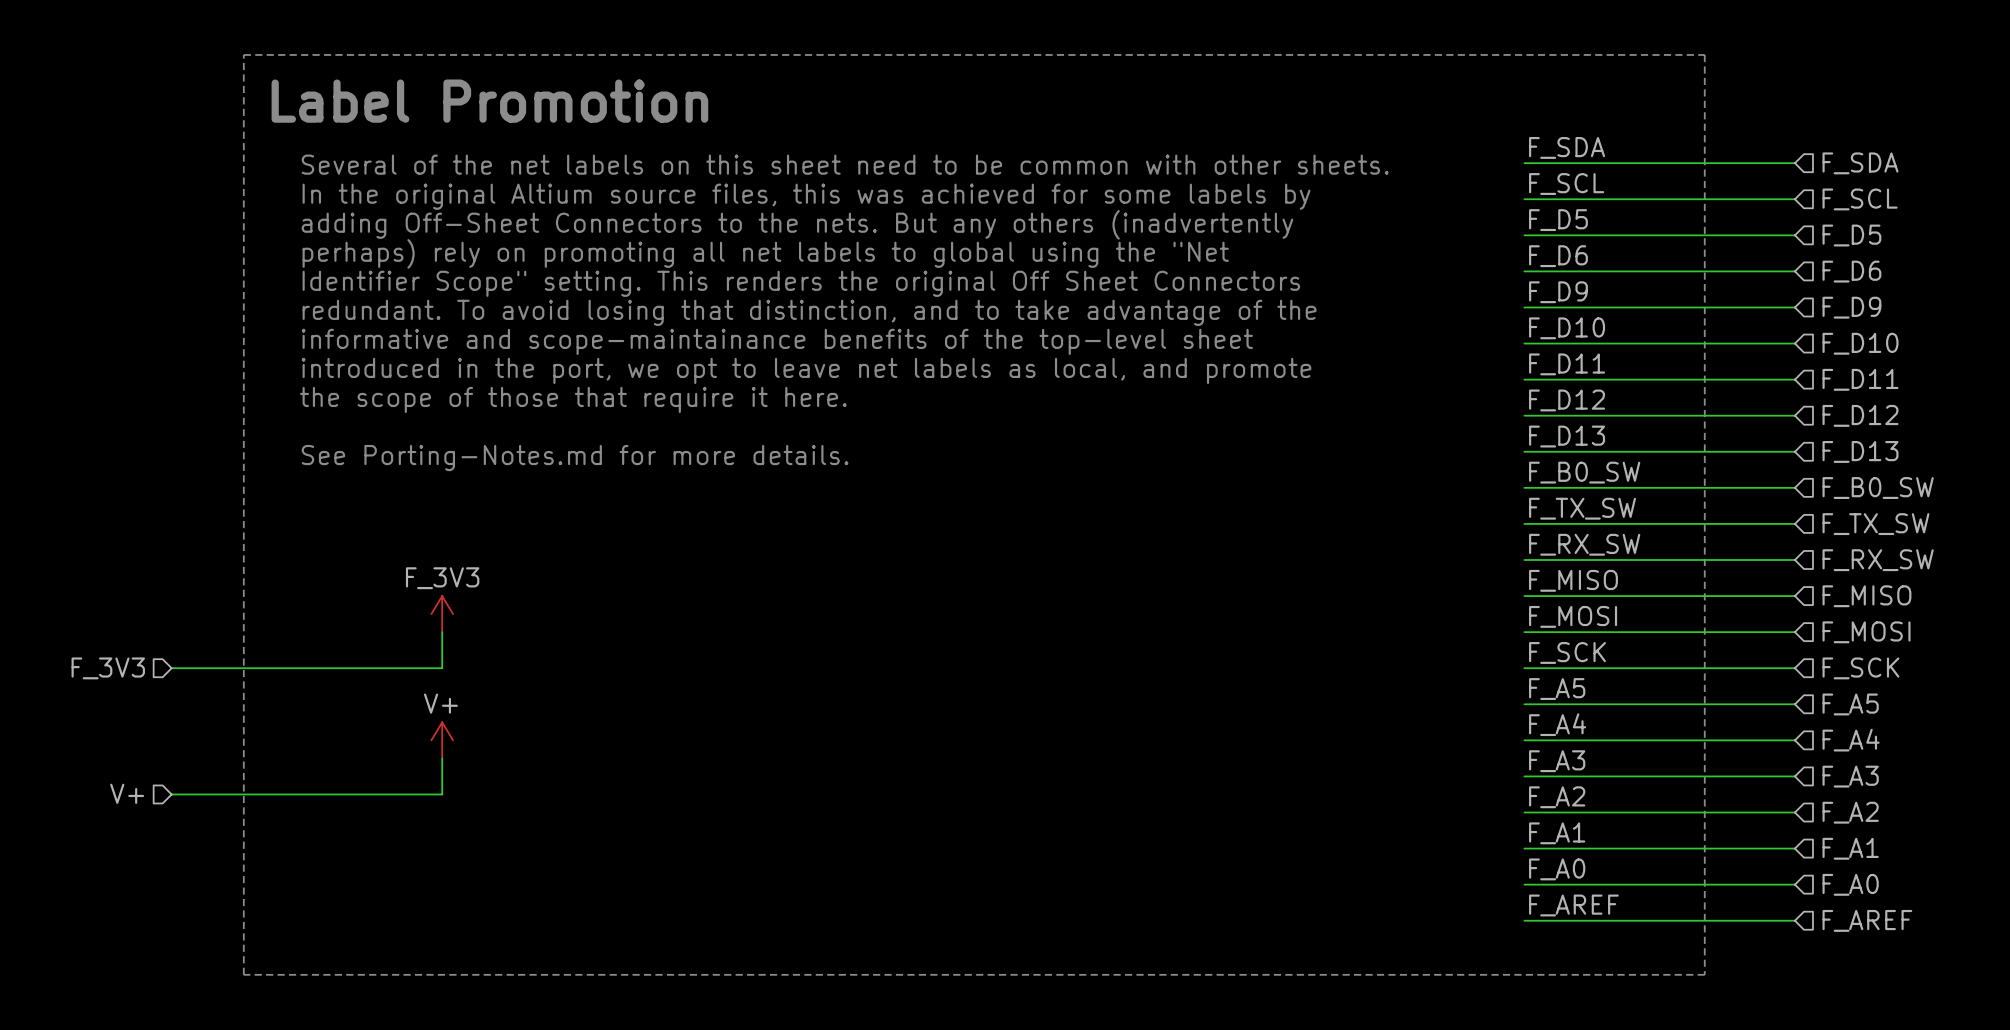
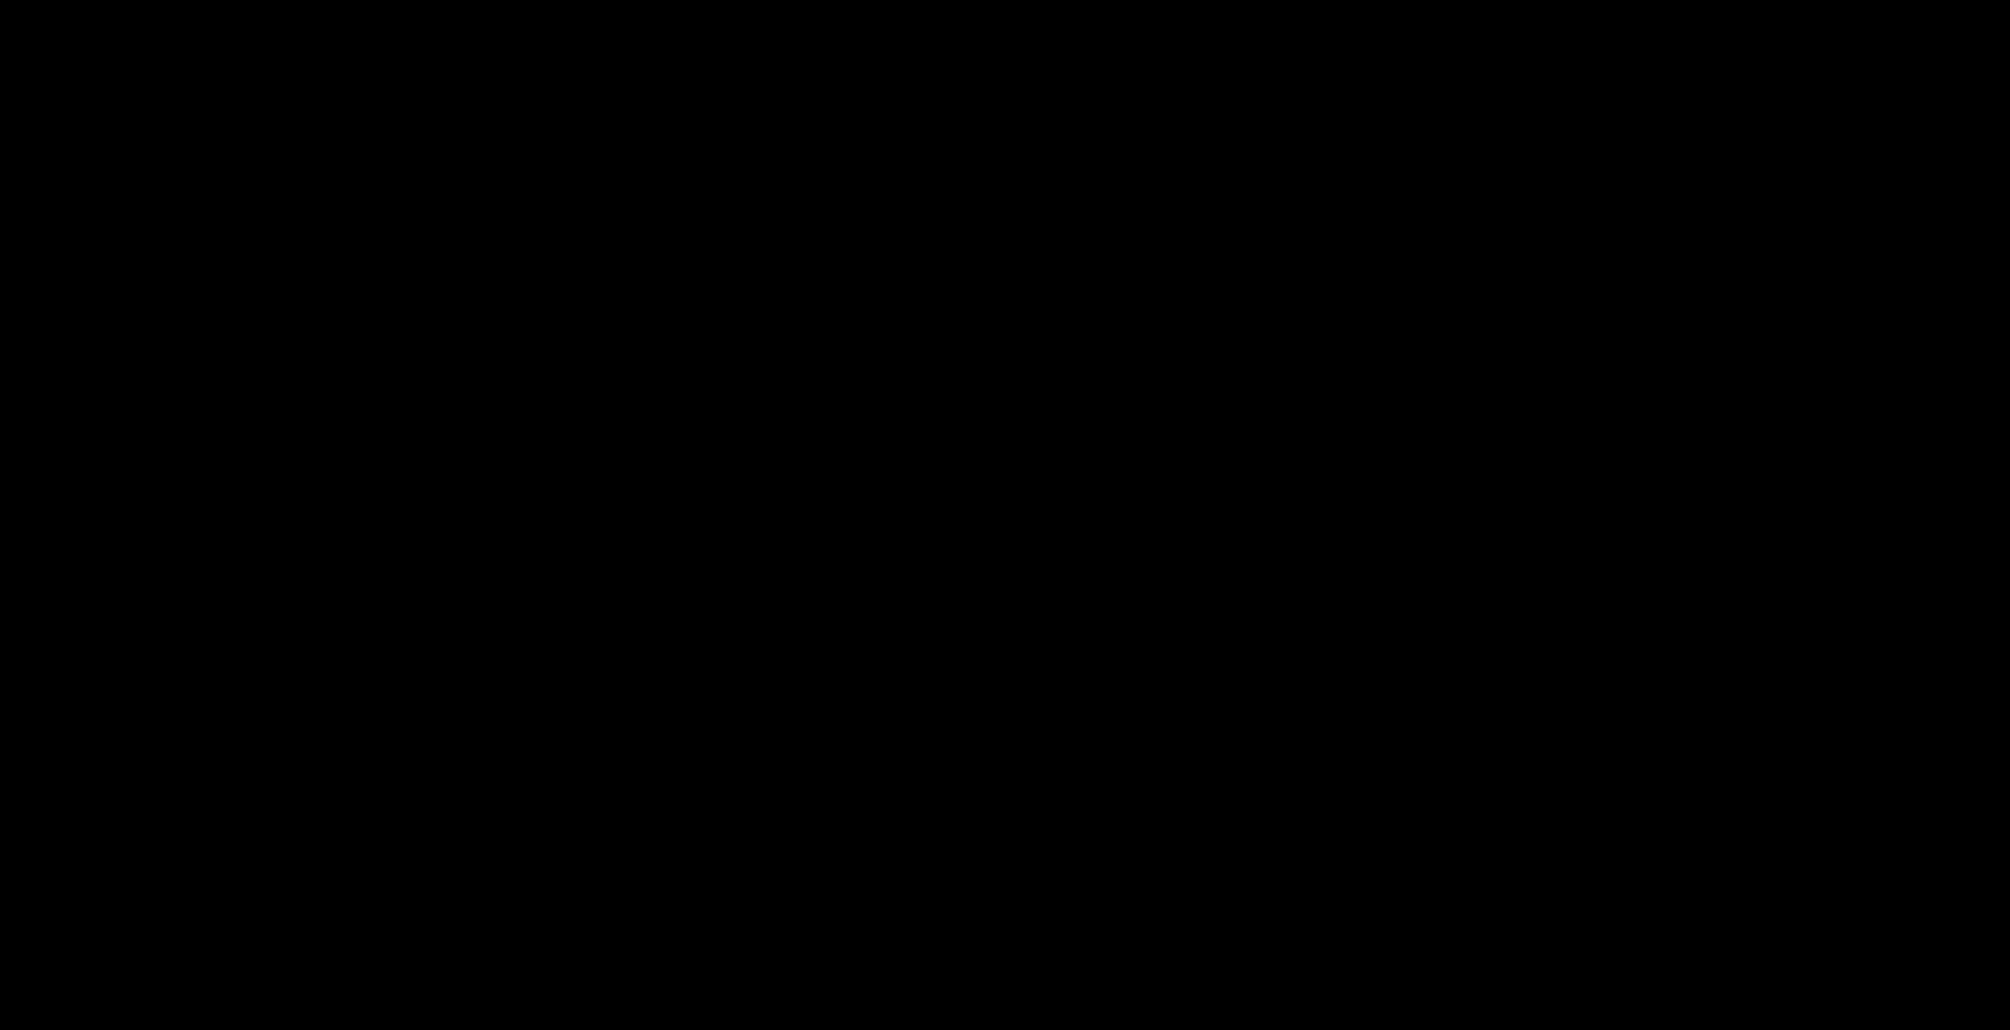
line: (243, 54) (1704, 54) (1704, 974) (243, 974) (243, 54) -> none
text: Label Promotion (489, 101) -> none
label: F_SDA (1567, 147) -> none
wire: (1524, 163) (1794, 163) -> none
hierarchical label: F_SDA (1860, 163) -> none
text: Several of the net labels on this sheet need to be common with other sheets. (845, 164) -> none
label: F_SCL (1566, 184) -> none
text: In the original Altium source files, this was achieved for some labels by (806, 196) -> none
wire: (1524, 199) (1794, 199) -> none
hierarchical label: F_SCL (1860, 199) -> none
label: F_D5 (1558, 220) -> none
text: adding Off-Sheet Connectors to the nets. But any others (inadvertently (797, 224) -> none
wire: (1524, 235) (1794, 235) -> none
hierarchical label: F_D5 (1851, 235) -> none
text: perhaps) rely on promoting all net labels to global using the "Net (765, 253) -> none
label: F_D6 (1558, 256) -> none
wire: (1524, 271) (1794, 271) -> none
hierarchical label: F_D6 (1851, 271) -> none
text: Identifier Scope" setting. This renders the original Off Sheet Connectors (801, 283) -> none
label: F_D9 (1558, 292) -> none
wire: (1524, 307) (1794, 307) -> none
hierarchical label: F_D9 (1851, 307) -> none
text: redundant. To avoid losing that distinction, and to take advantage of the (809, 312) -> none
label: F_D10 (1567, 328) -> none
text: informative and scope-maintainance benefits of the top-level sheet (777, 341) -> none
wire: (1524, 343) (1794, 343) -> none
hierarchical label: F_D10 (1860, 343) -> none
label: F_D11 (1567, 364) -> none
text: introduced in the port, we opt to leave net labels as local, and promote (806, 370) -> none
wire: (1524, 379) (1794, 379) -> none
hierarchical label: F_D11 (1860, 379) -> none
text: the scope of those that require it here. (573, 399) -> none
label: F_D12 (1567, 400) -> none
wire: (1524, 415) (1794, 415) -> none
hierarchical label: F_D12 (1860, 415) -> none
label: F_D13 (1567, 436) -> none
wire: (1524, 451) (1794, 451) -> none
hierarchical label: F_D13 (1860, 451) -> none
text: See Porting-Notes.md for more details. (575, 458) -> none
label: F_B0_SW (1584, 472) -> none
wire: (1524, 487) (1794, 487) -> none
hierarchical label: F_B0_SW (1878, 488) -> none
label: F_TX_SW (1582, 508) -> none
wire: (1524, 523) (1794, 523) -> none
hierarchical label: F_TX_SW (1875, 524) -> none
label: F_RX_SW (1584, 544) -> none
wire: (1524, 559) (1794, 559) -> none
hierarchical label: F_RX_SW (1878, 560) -> none
label: F_MISO (1573, 580) -> none
wire: (1524, 596) (1794, 596) -> none
hierarchical label: F_MISO (1866, 596) -> none
power symbol: F_3V3 (442, 614) -> none
label: F_MOSI (1573, 616) -> none
wire: (442, 632) (442, 668) (171, 668) -> none
wire: (1524, 632) (1794, 632) -> none
hierarchical label: F_MOSI (1866, 632) -> none
label: F_SCK (1567, 652) -> none
hierarchical label: F_3V3 (108, 668) -> none
wire: (1524, 668) (1794, 668) -> none
hierarchical label: F_SCK (1860, 668) -> none
label: F_A5 (1557, 689) -> none
wire: (1524, 704) (1794, 704) -> none
hierarchical label: F_A5 (1850, 704) -> none
label: F_A4 (1557, 724) -> none
power symbol: V+ (442, 740) -> none
wire: (1524, 740) (1794, 740) -> none
hierarchical label: F_A4 (1851, 740) -> none
wire: (442, 758) (442, 794) (171, 794) -> none
label: F_A3 (1557, 761) -> none
wire: (1524, 776) (1794, 776) -> none
hierarchical label: F_A3 (1850, 776) -> none
hierarchical label: V+ (127, 793) -> none
label: F_A2 (1557, 797) -> none
wire: (1524, 812) (1794, 812) -> none
hierarchical label: F_A2 (1850, 812) -> none
label: F_A1 (1557, 833) -> none
wire: (1524, 848) (1794, 848) -> none
hierarchical label: F_A1 (1850, 848) -> none
label: F_A0 (1557, 869) -> none
wire: (1524, 884) (1794, 884) -> none
hierarchical label: F_A0 (1850, 884) -> none
label: F_AREF (1573, 905) -> none
wire: (1524, 920) (1794, 920) -> none
hierarchical label: F_AREF (1867, 920) -> none

